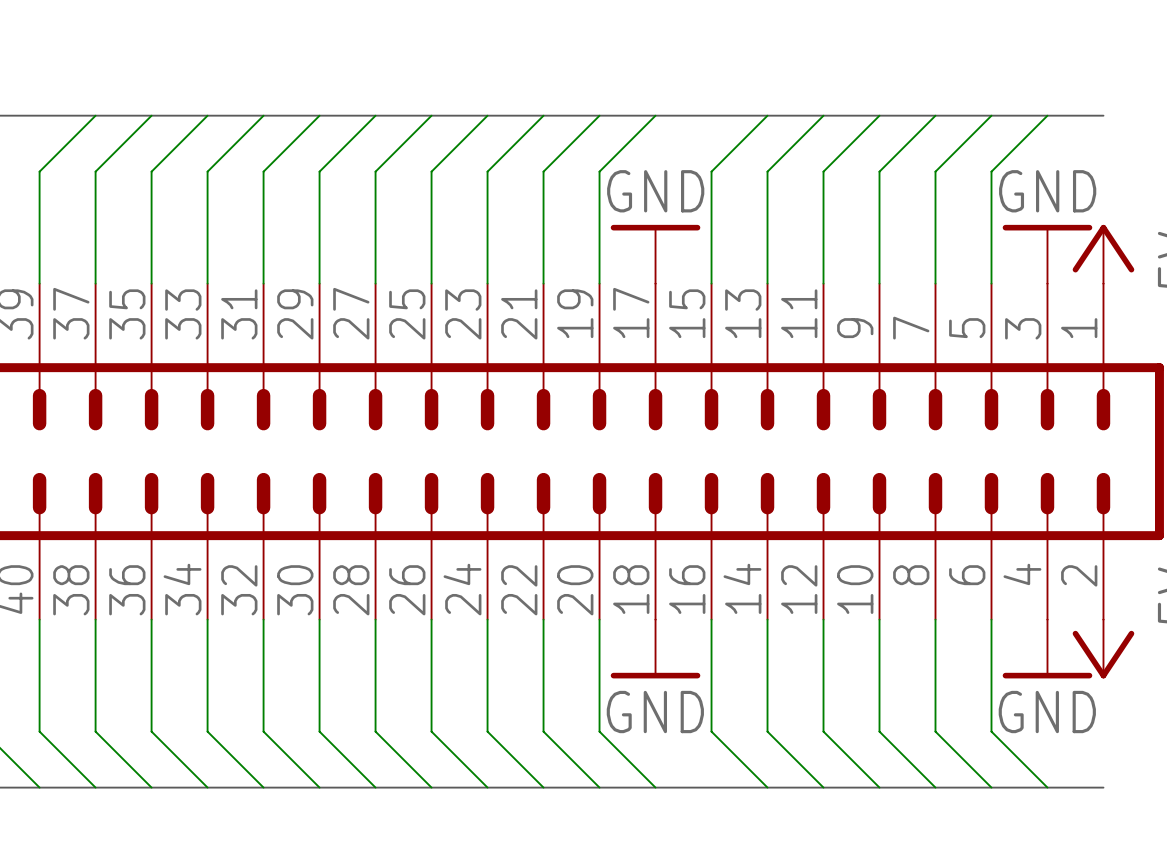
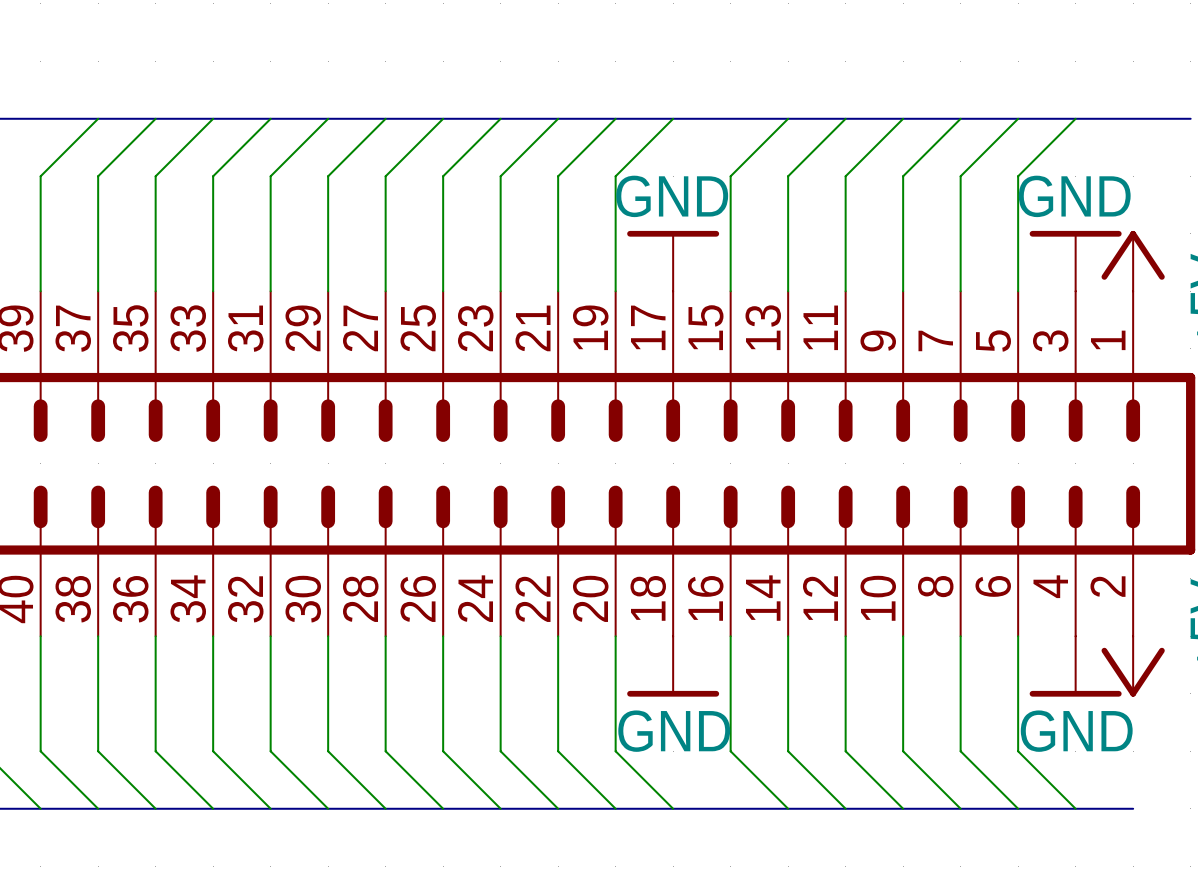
bus: none -> (1133, 118) (1190, 118)

